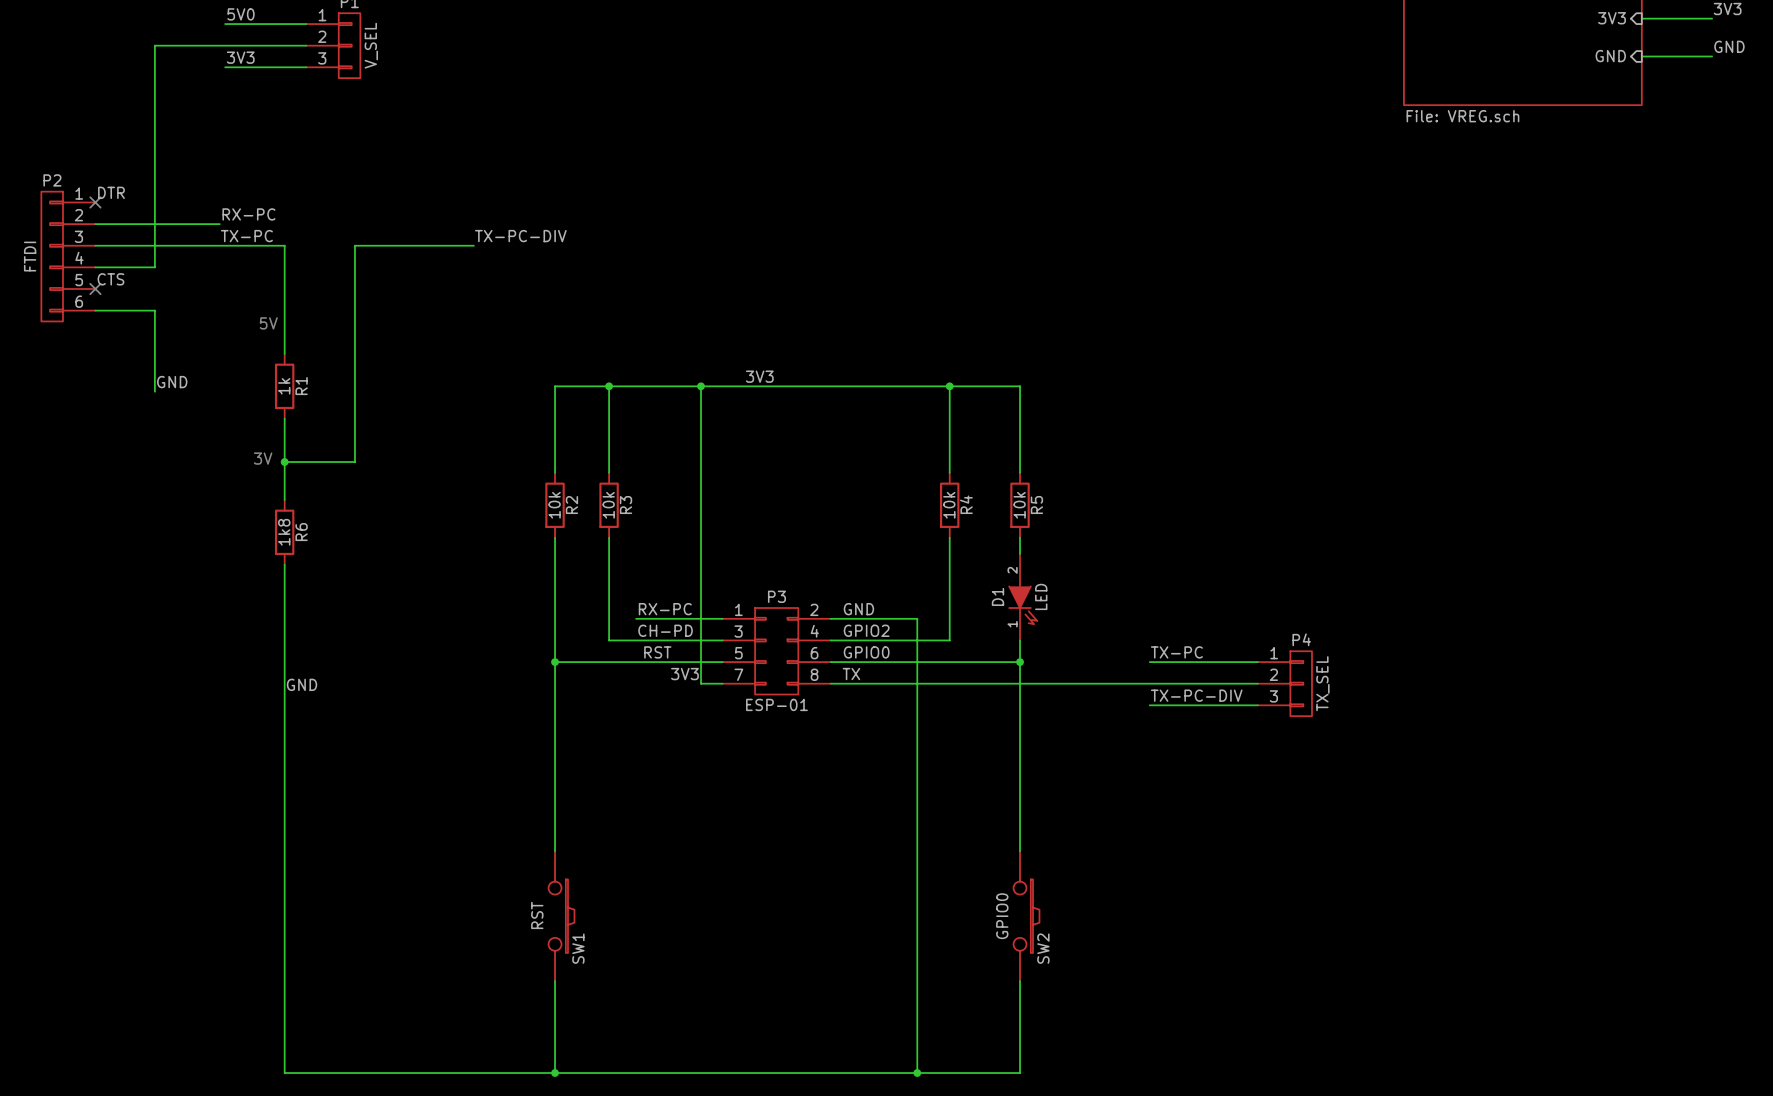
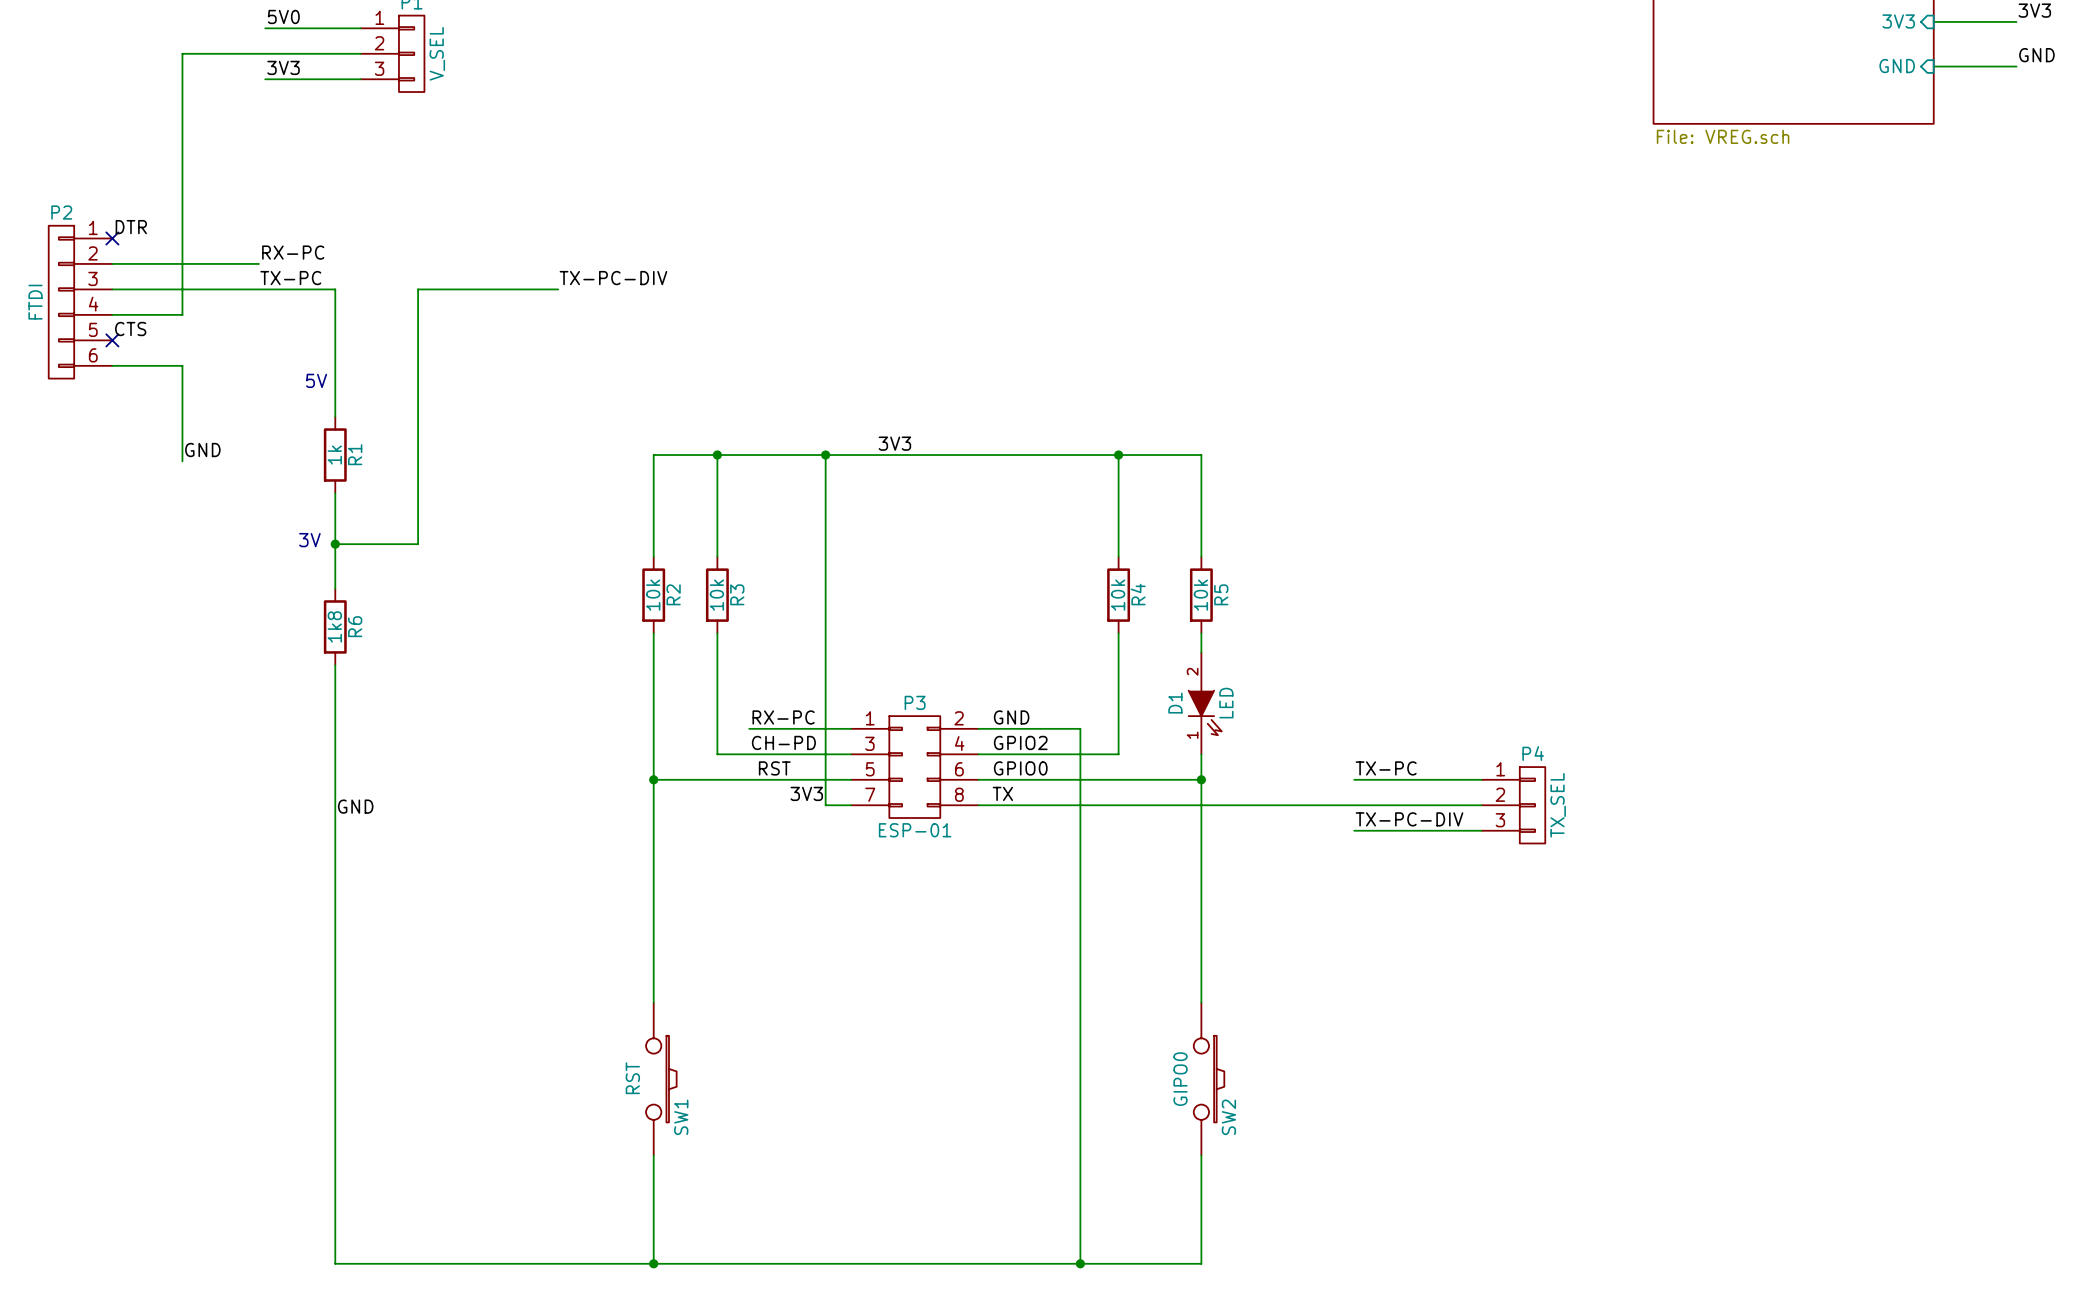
SW2 value: GPIO0 (1002, 916) -> GIPO0 (1180, 1079)

